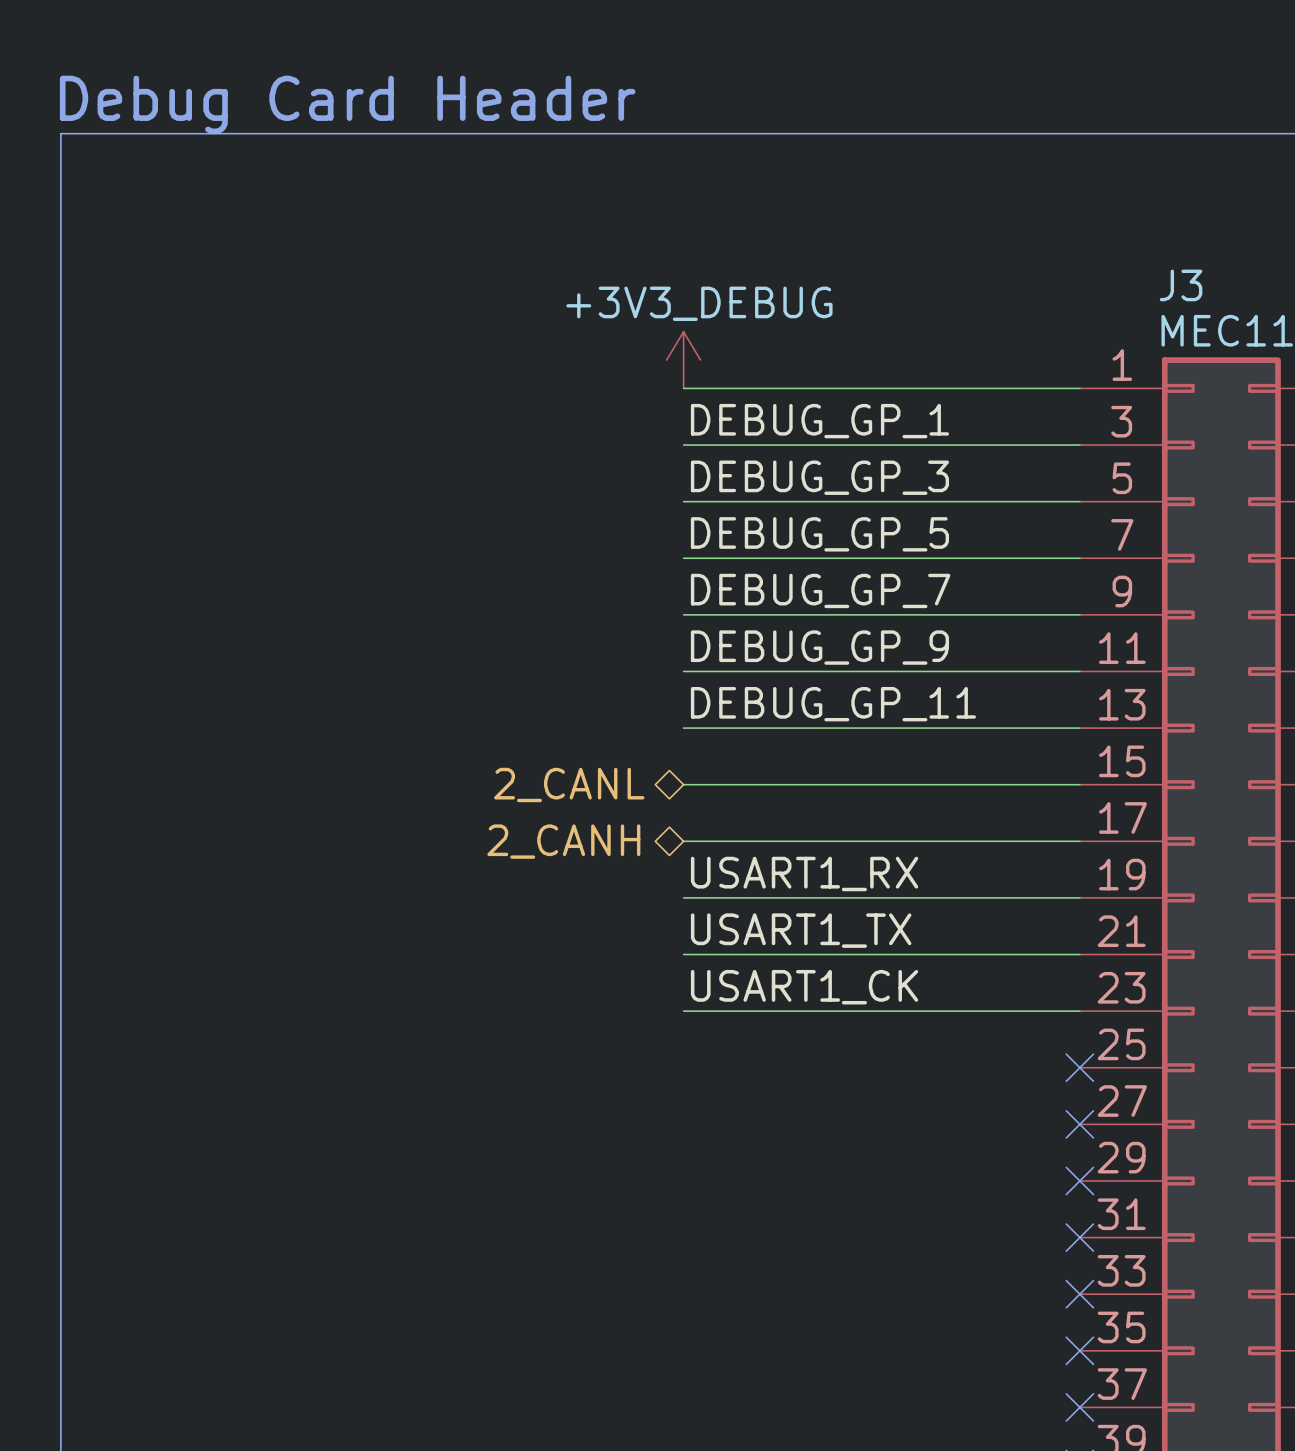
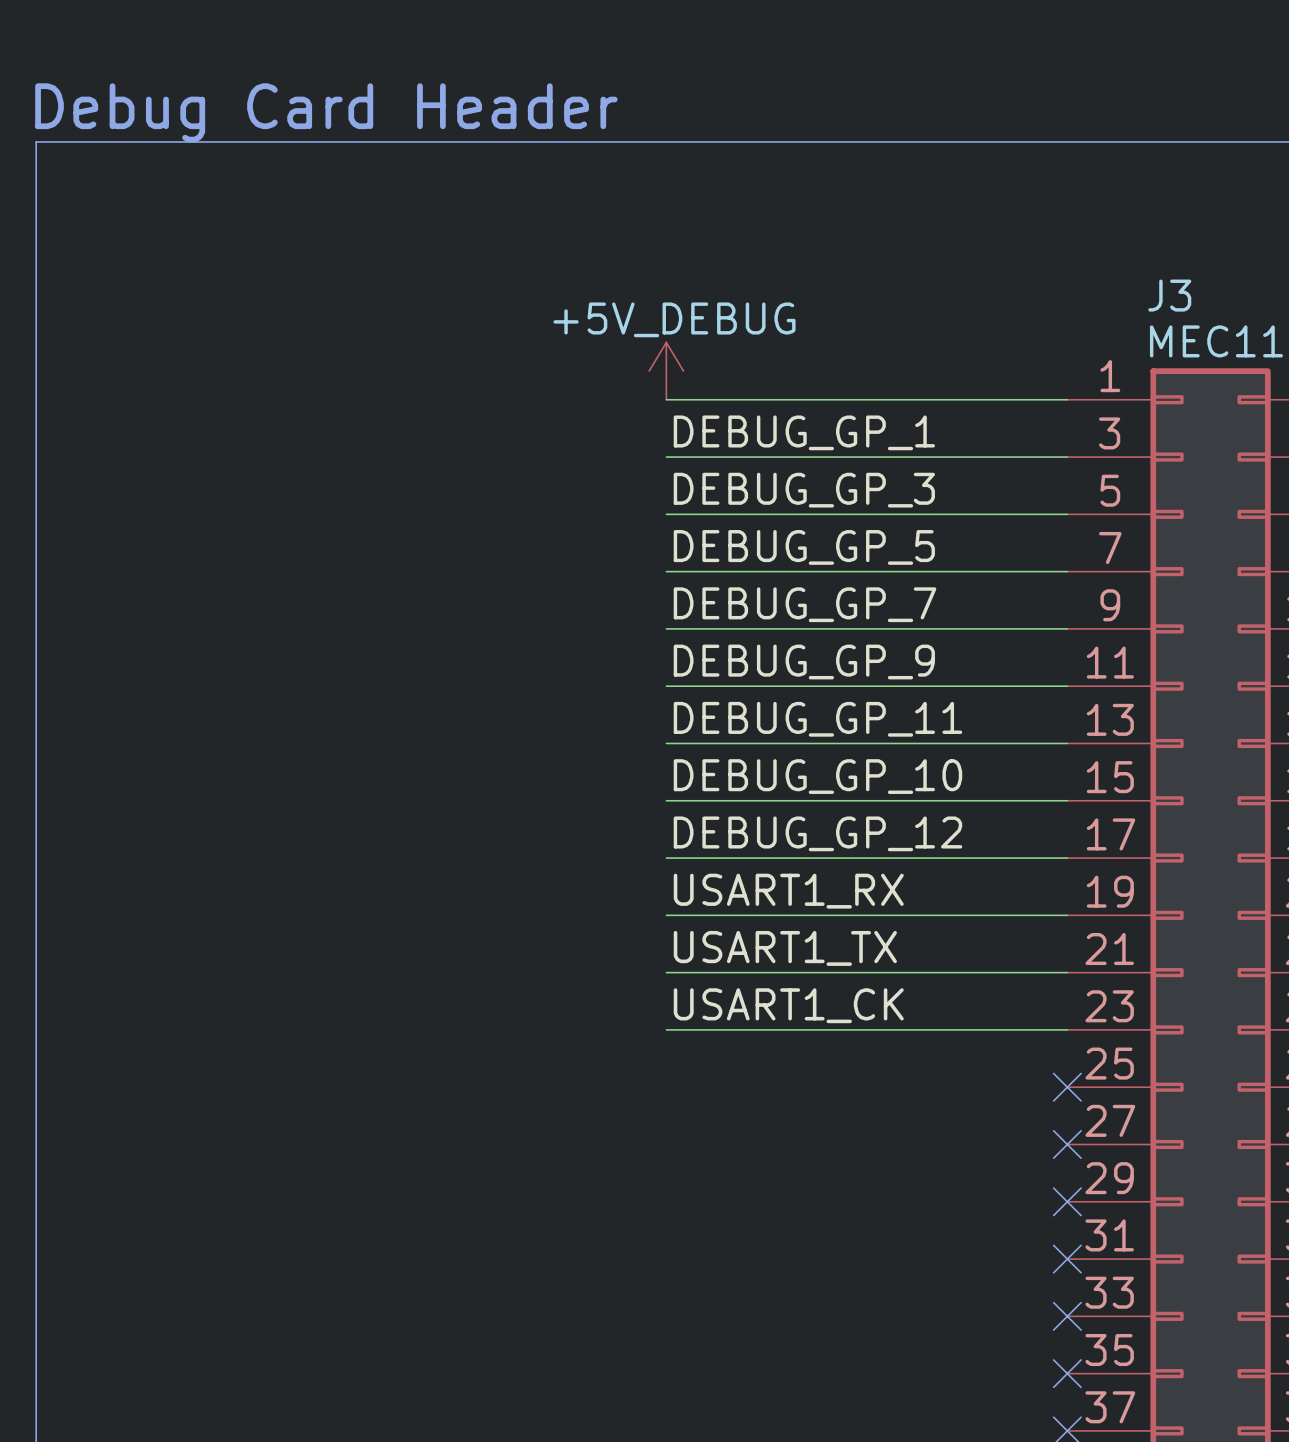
power symbol: +3V3_DEBUG (683, 360) -> +5V_DEBUG (666, 371)
label: none -> DEBUG_GP_10 (817, 776)
hierarchical label: 2_CANL (569, 784) -> none
label: none -> DEBUG_GP_12 (817, 833)
hierarchical label: 2_CANH (563, 841) -> none

